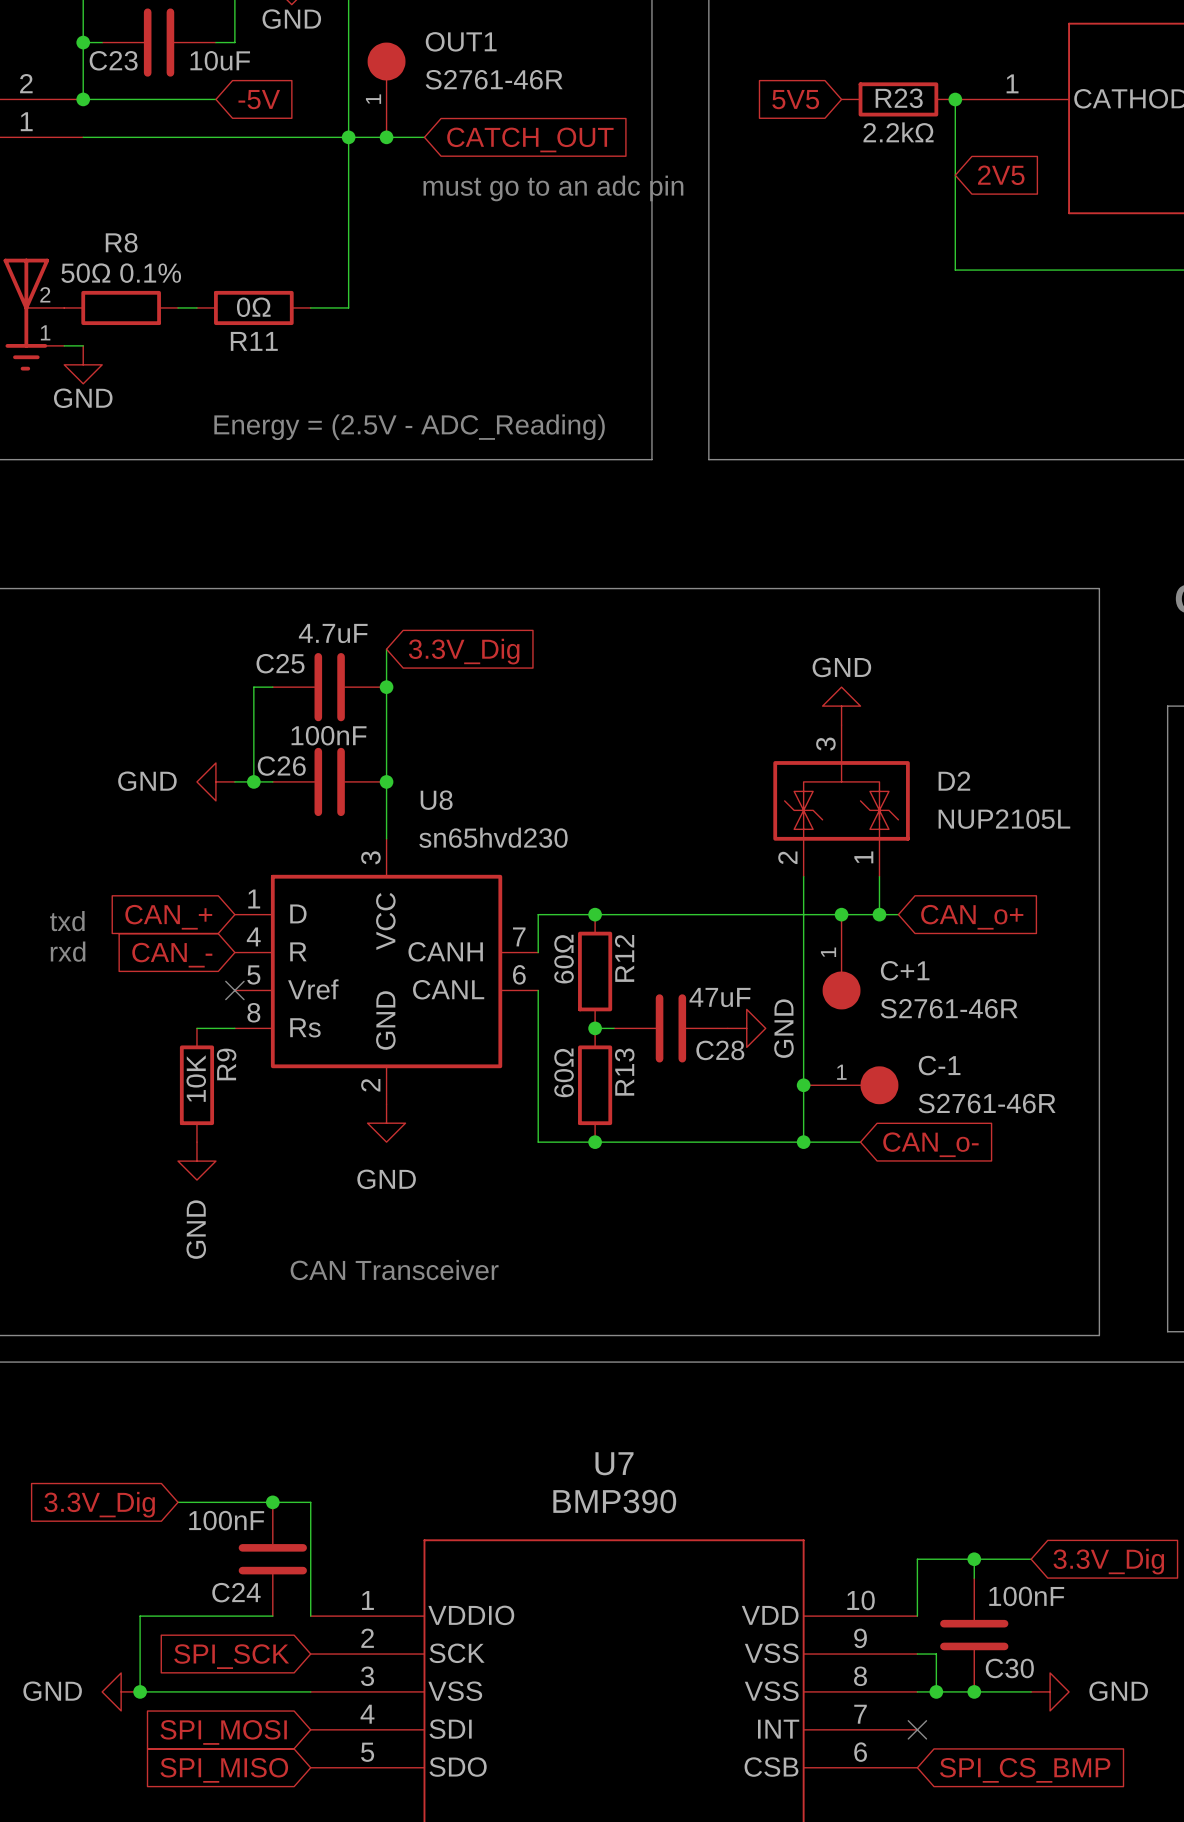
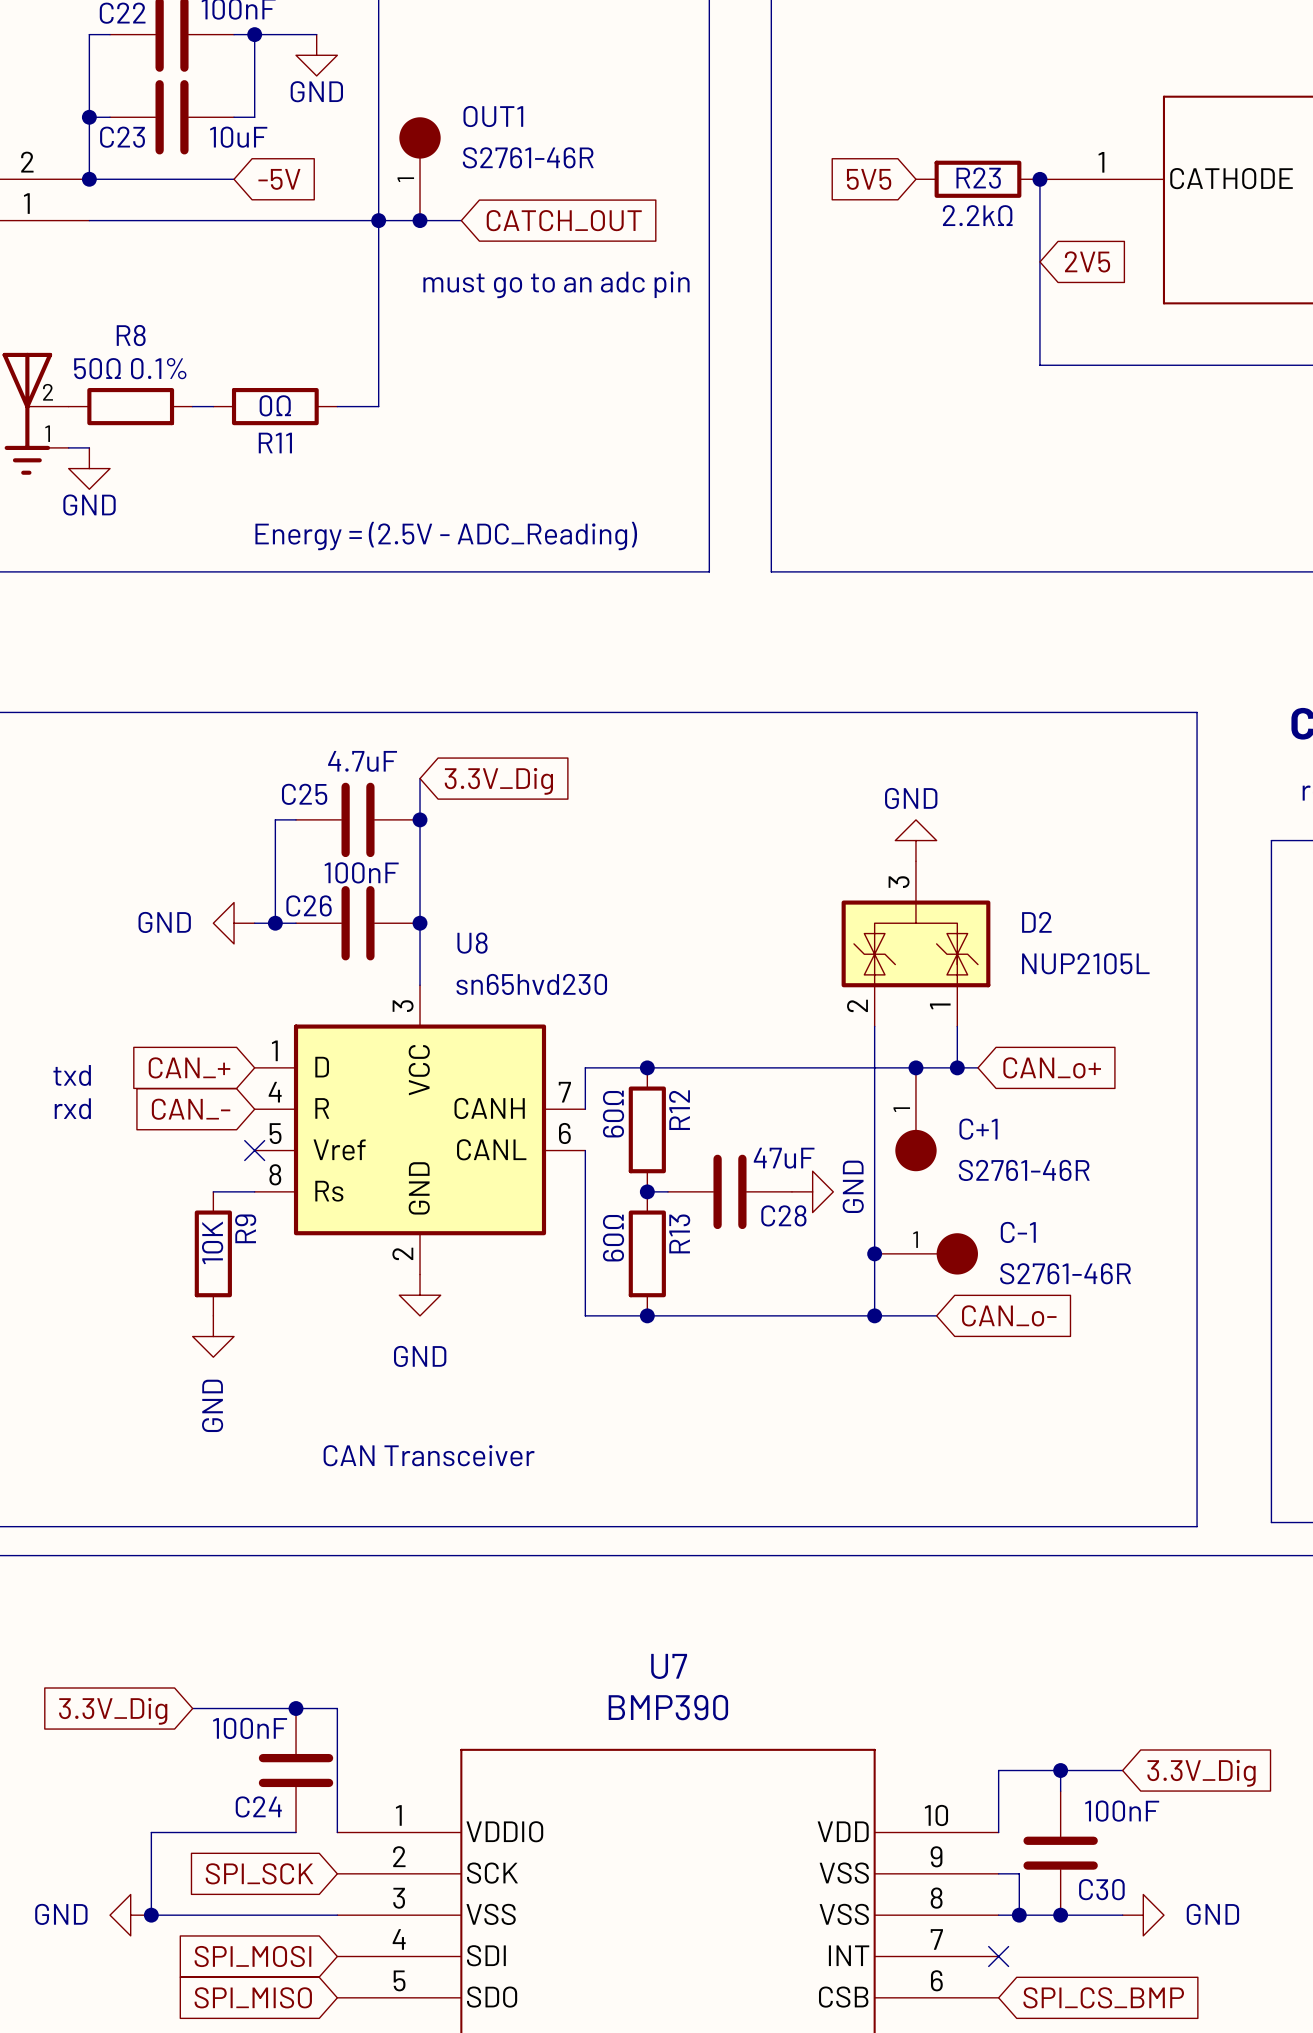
text position: must go to an adc pin (553, 188) -> must go to an adc pin (556, 284)

